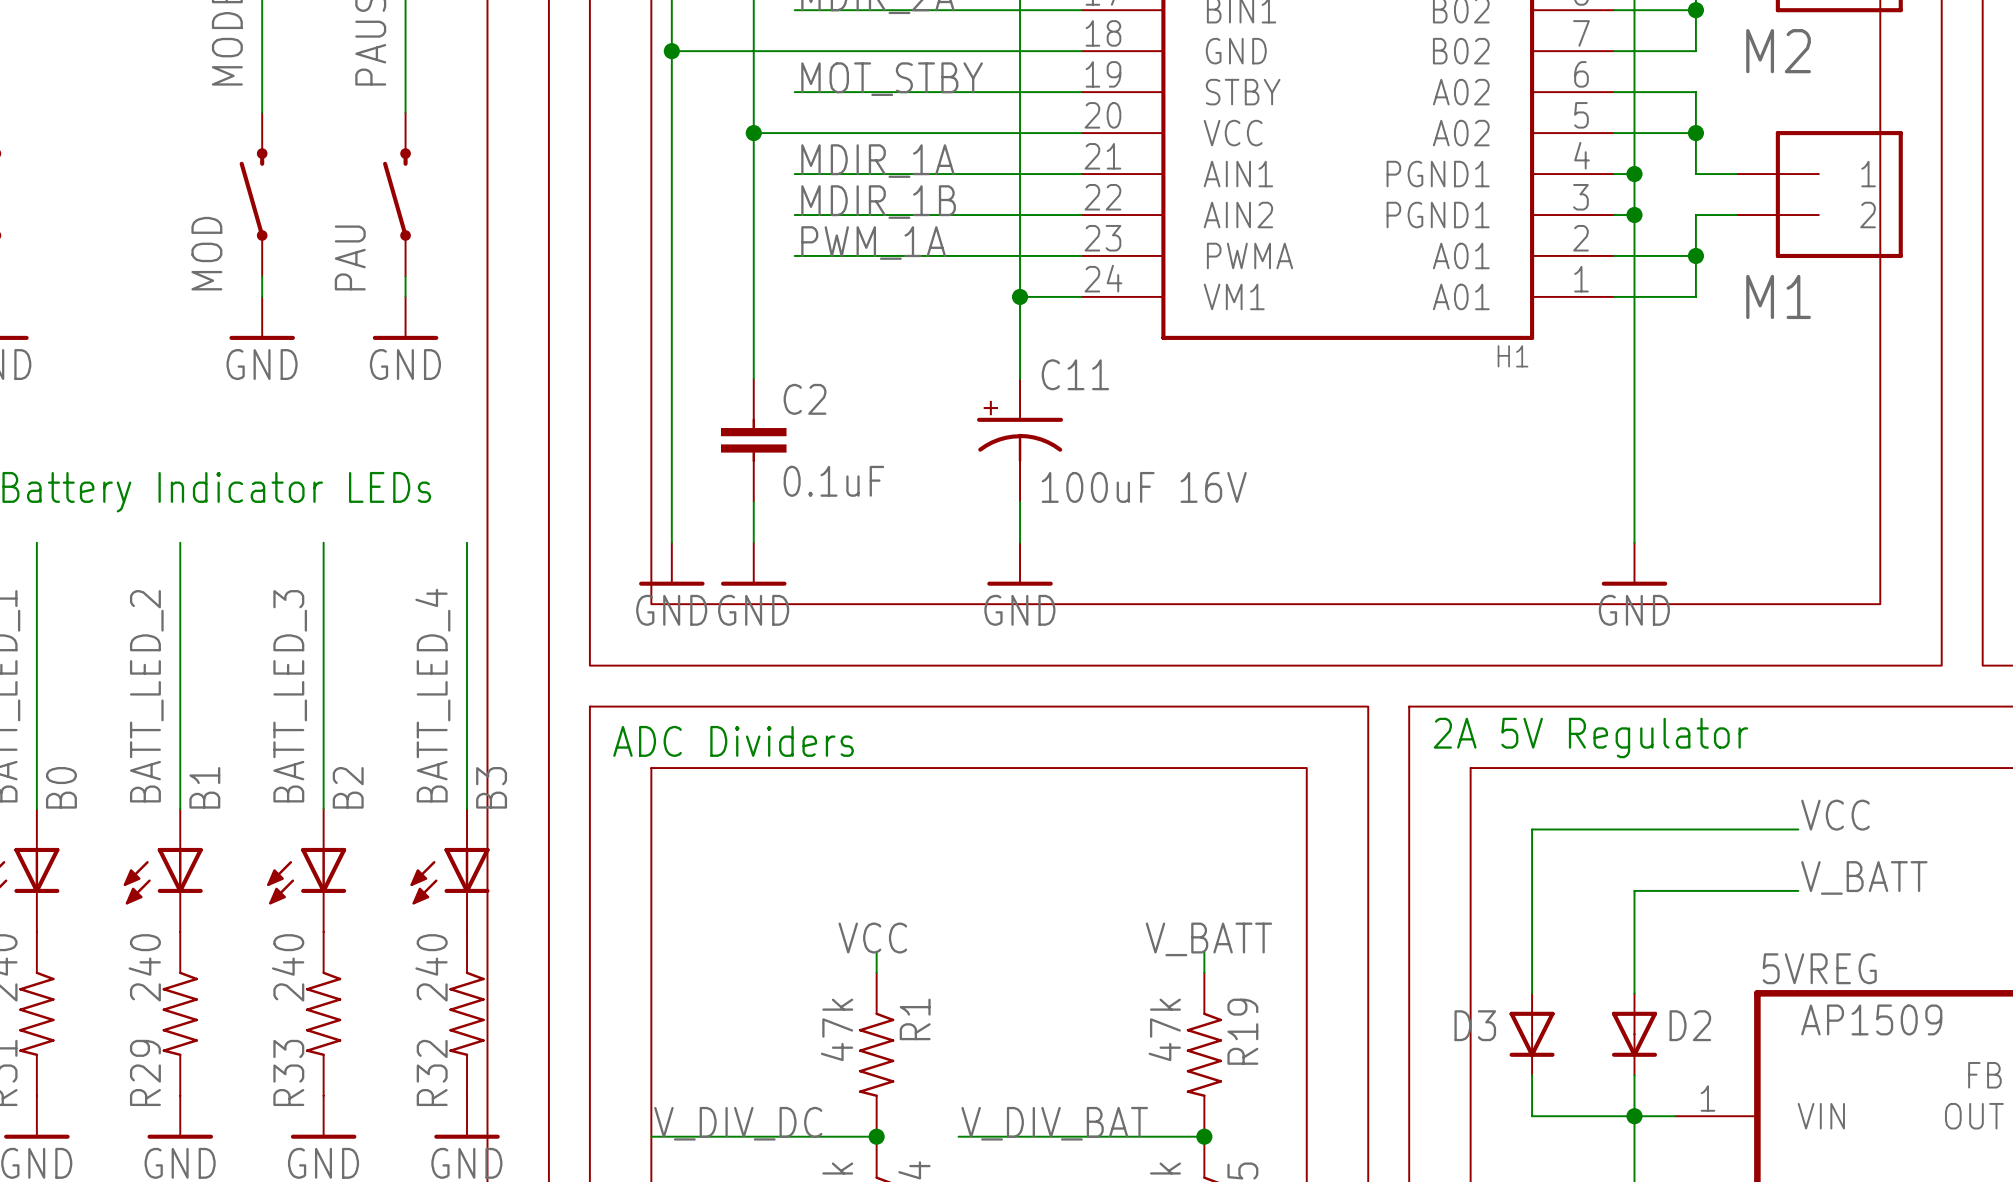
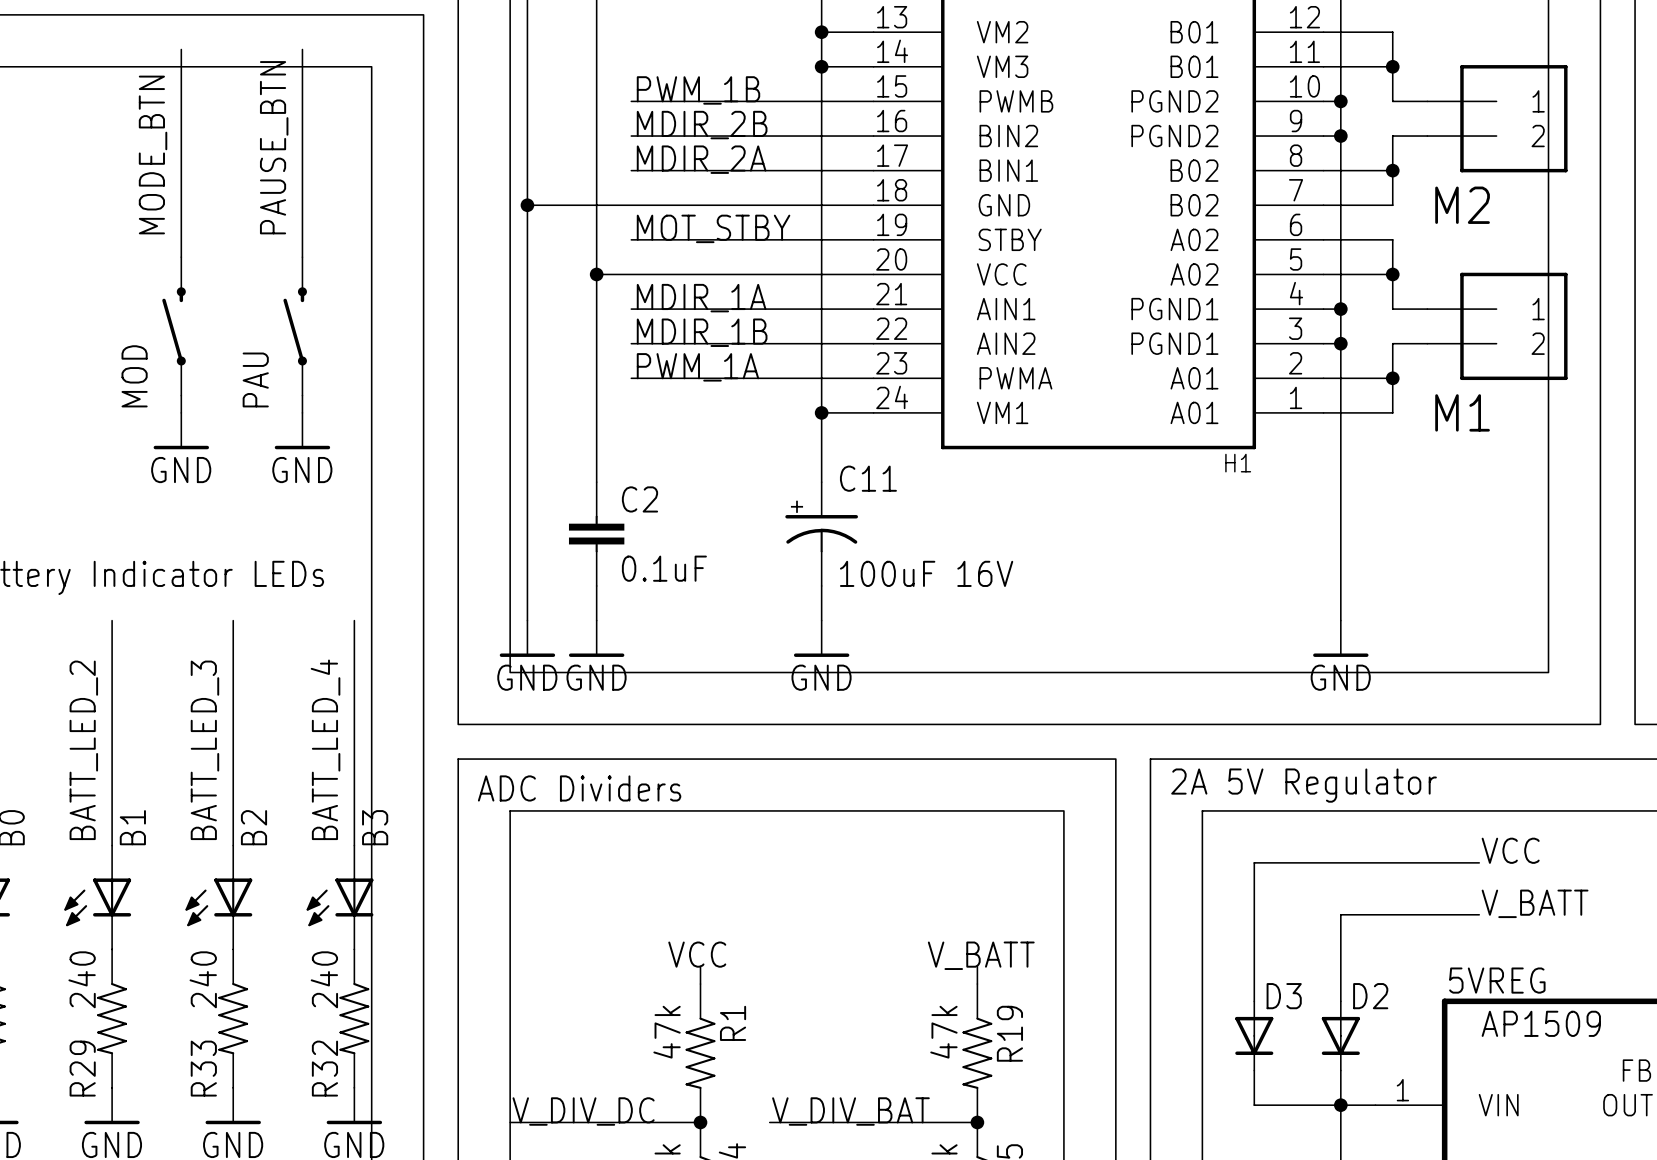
D3 name position: D3 (1475, 1025) -> D3 (1284, 996)
D2 name position: D2 (1690, 1025) -> D2 (1370, 996)

